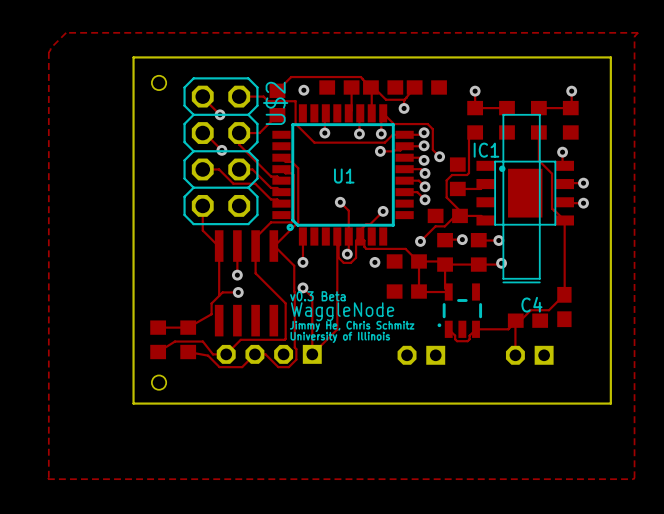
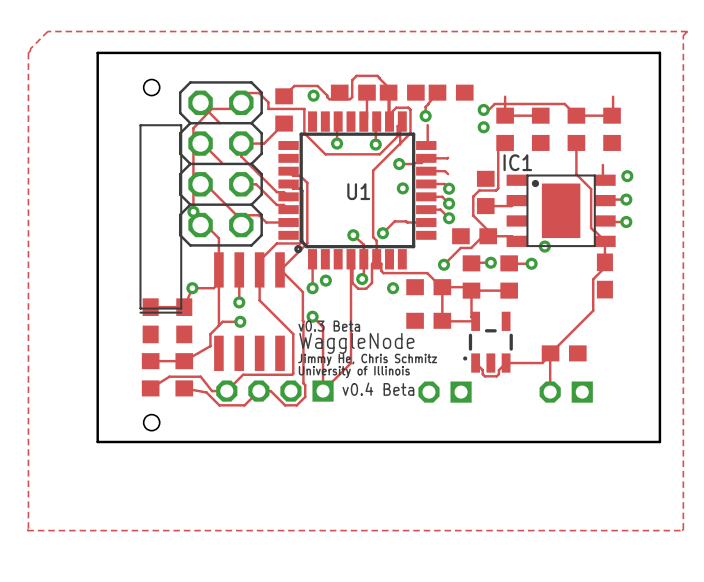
board edge: (133, 57) (133, 403) (610, 403) (610, 57) (133, 57) -> (97, 52) (97, 441) (659, 441) (659, 52) (97, 52)
track: (286, 81) (291, 77) (360, 77) (386, 99) (404, 99) -> (294, 85) (317, 85) (329, 99) (350, 99) (352, 97) (352, 80) (356, 75) (377, 75) (388, 87) (388, 120) (392, 118) (392, 111) (396, 107) (408, 107) (410, 109) (410, 133) (373, 170) (373, 237) (376, 240) (376, 252)
via: (475, 91) -> none
via: (571, 91) -> none
track: (239, 96) (263, 96) (268, 101) (295, 102) -> (193, 211) (193, 128) (211, 108) (230, 108) (245, 93) (259, 93) (268, 102) (268, 108) (304, 108)
track: none -> (483, 109) (488, 109) (494, 103) (564, 103) (576, 115)
via: none -> (483, 109)
U$2 name: U$2 (275, 103) -> none
track: (383, 113) (393, 124) (427, 124) (432, 129) (432, 149) (439, 156) -> none
via: (220, 114) -> none
track: none -> (427, 125) (426, 145)
via: none -> (483, 127)
track: (424, 132) (422, 134) (392, 134) (384, 142) (363, 142) -> (402, 121) (397, 126) (397, 136) (379, 154)
via: (424, 132) -> none
via: (381, 133) -> none
via: (424, 145) -> none
via: (221, 150) -> none
via position: (562, 152) -> (627, 176)
via: (439, 156) -> none
via: (424, 160) -> none
track: (202, 169) (219, 169) (233, 183) (255, 183) (271, 199) (277, 199) (281, 203) -> (211, 190) (236, 215) (259, 215) (266, 222) (288, 222)
via: none -> (402, 188)
via: none -> (193, 211)
part position: (521, 198) -> (160, 218)
track: (340, 202) (348, 210) (348, 223) -> (353, 235) (363, 244)
via position: (340, 202) -> (353, 235)
track: none -> (426, 222) (394, 221) (382, 233)
track: (202, 205) (202, 230) (219, 246) -> none
track: none -> (211, 231) (218, 238) (218, 269)
track: (383, 211) (370, 224) (366, 224) (360, 230) -> none
via: (383, 211) -> none
via: none -> (382, 233)
track: (564, 220) (564, 294) (548, 310) (530, 310) (520, 320) -> (605, 241) (604, 267) (593, 279) (593, 310) (550, 353)
via: none -> (325, 280)
track: none -> (218, 283) (213, 288) (192, 288) (184, 307) (150, 307)
via: none -> (192, 288)
track: (501, 263) (478, 264) -> none
via position: (501, 263) -> (544, 246)
part: none -> (150, 320)
part: none -> (184, 320)
C4 name: C4 (531, 304) -> none
part position: (564, 307) -> (604, 275)
text: none -> v0.4 Beta (378, 389)

